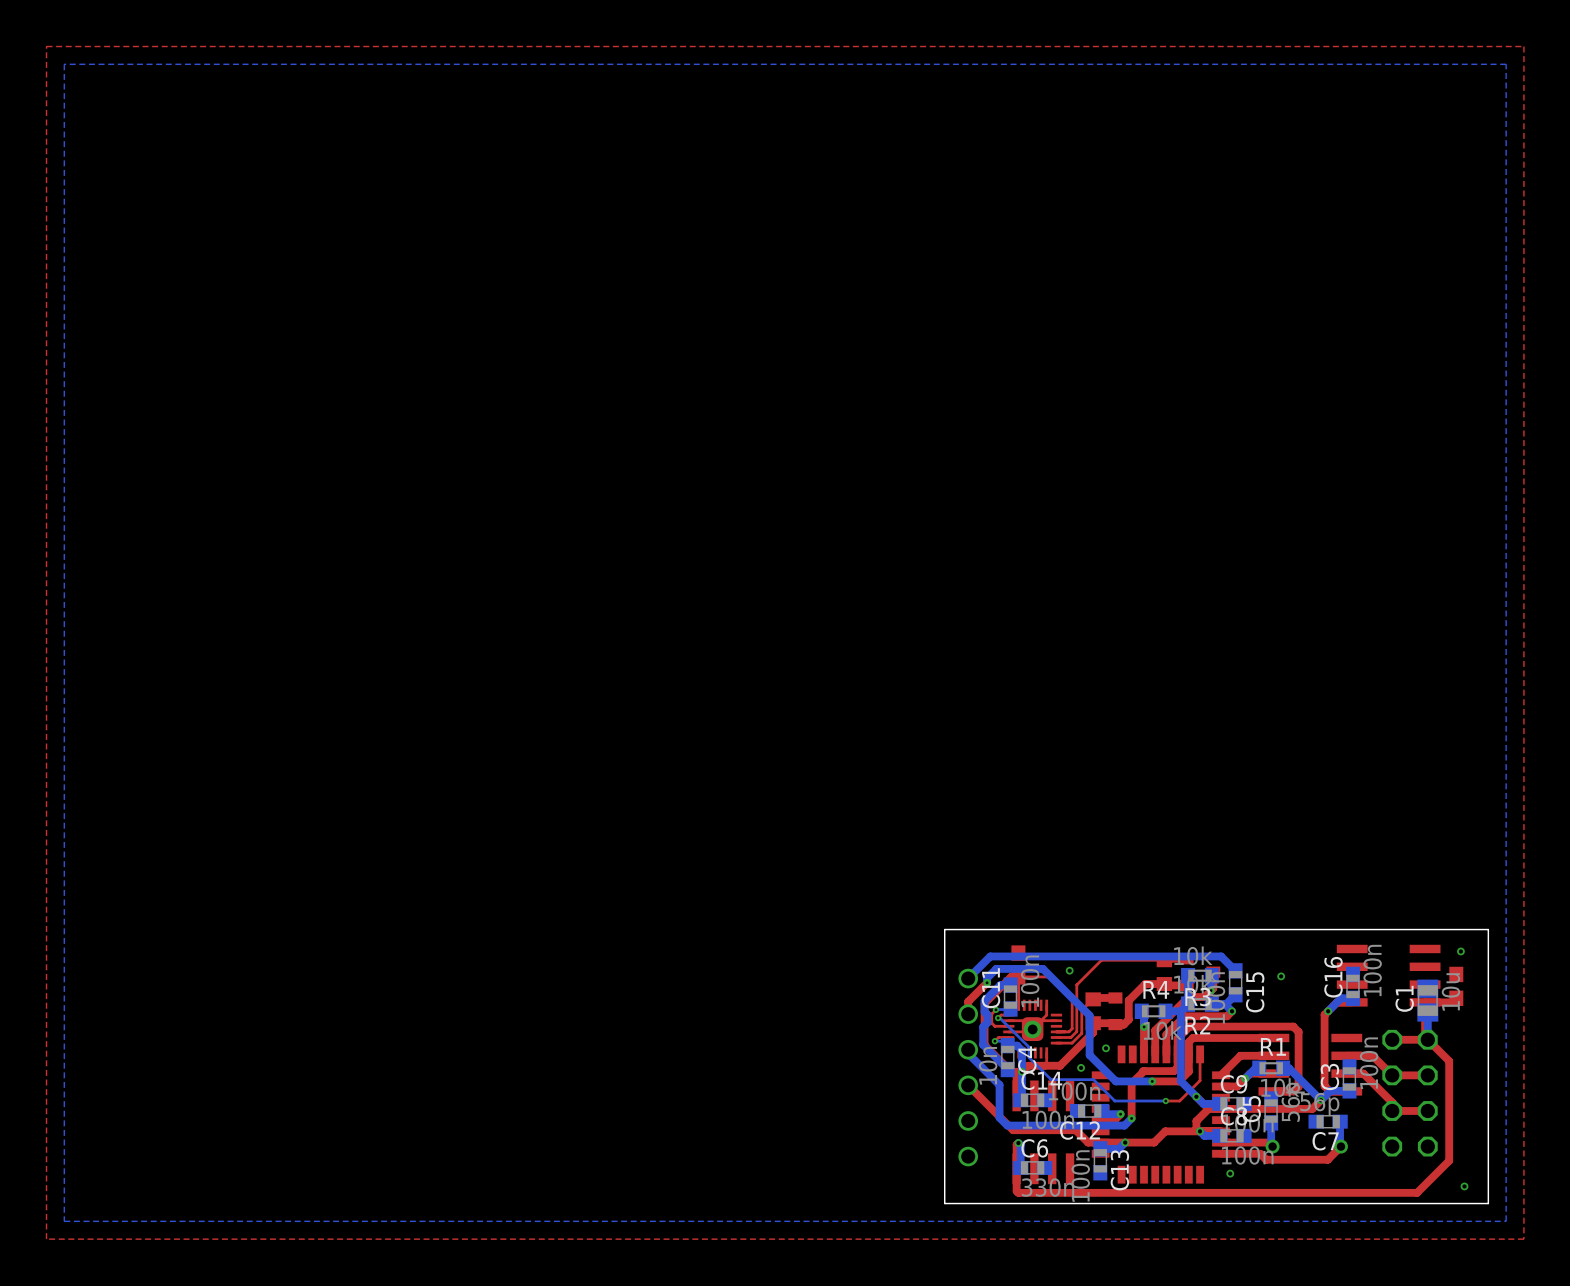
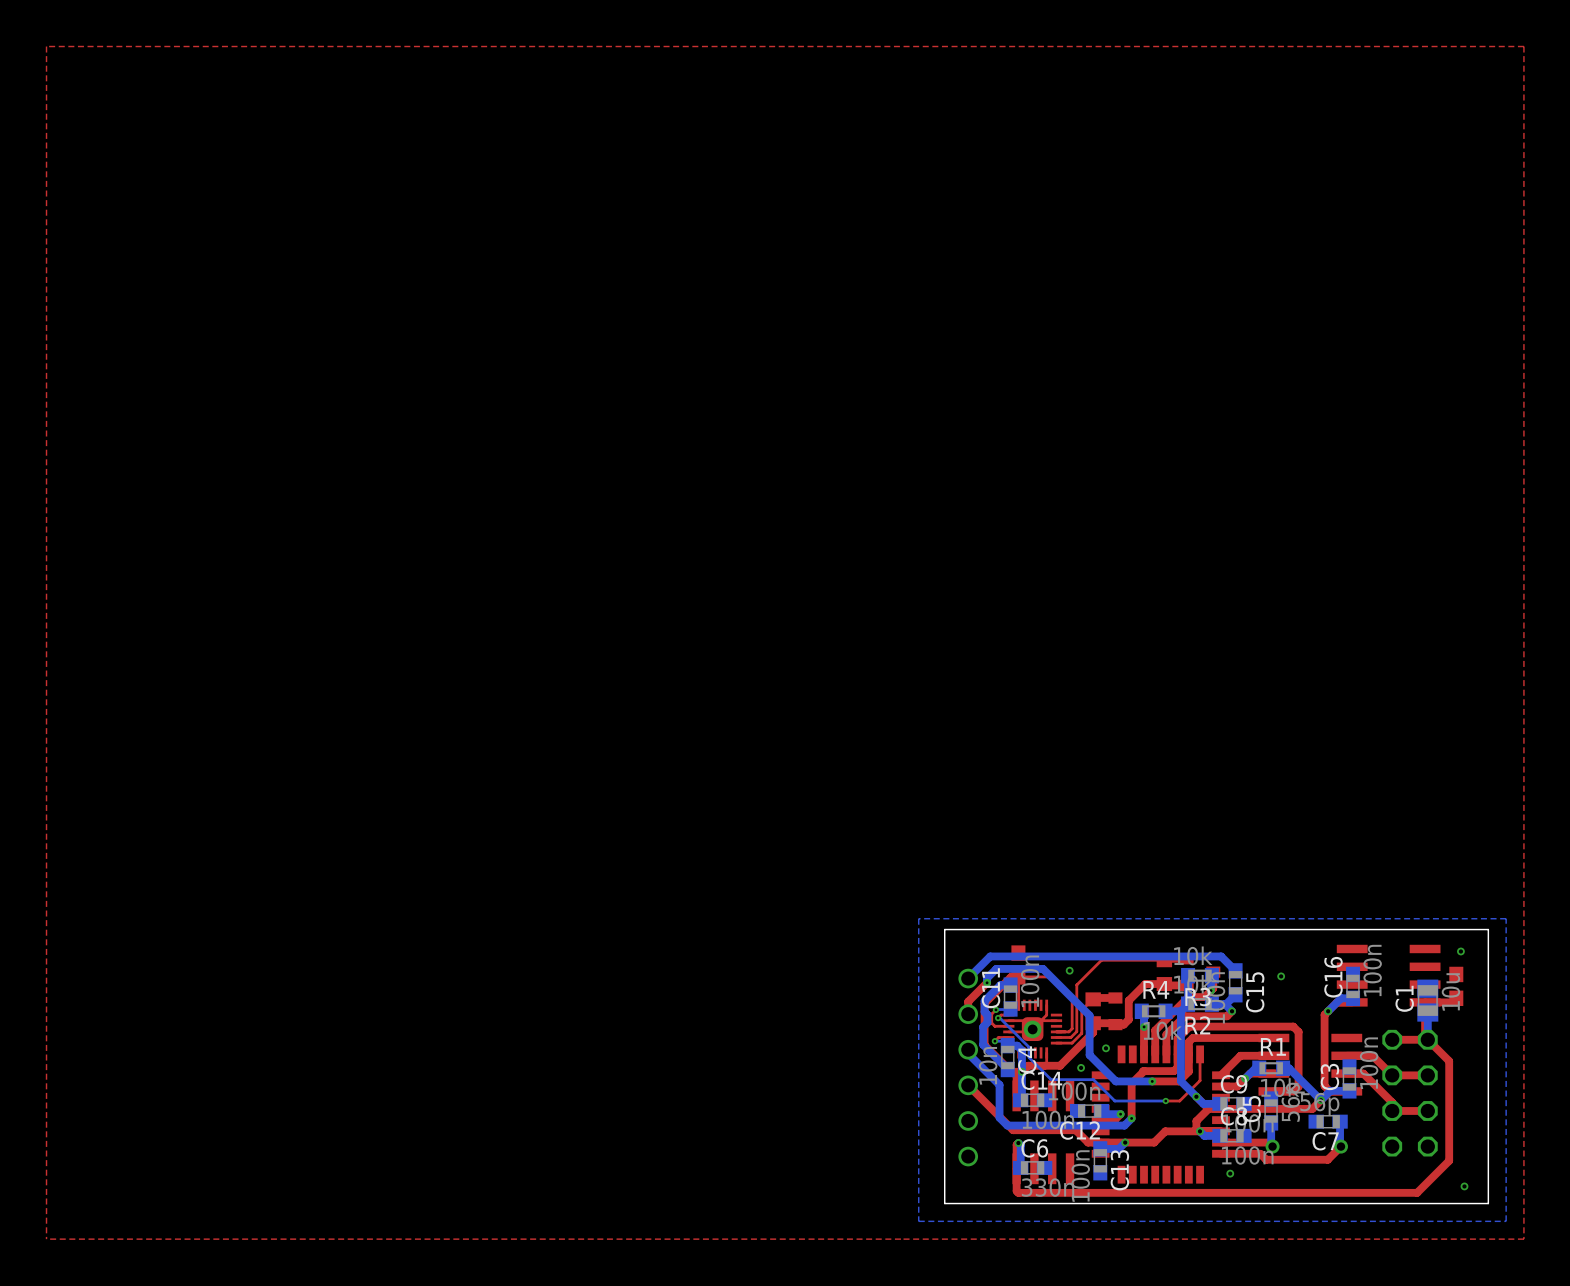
bottom zone outline: (1506, 918) (1506, 64) (64, 64) (64, 1221) (918, 1221) -> (1506, 918) (918, 918) (918, 1221)

